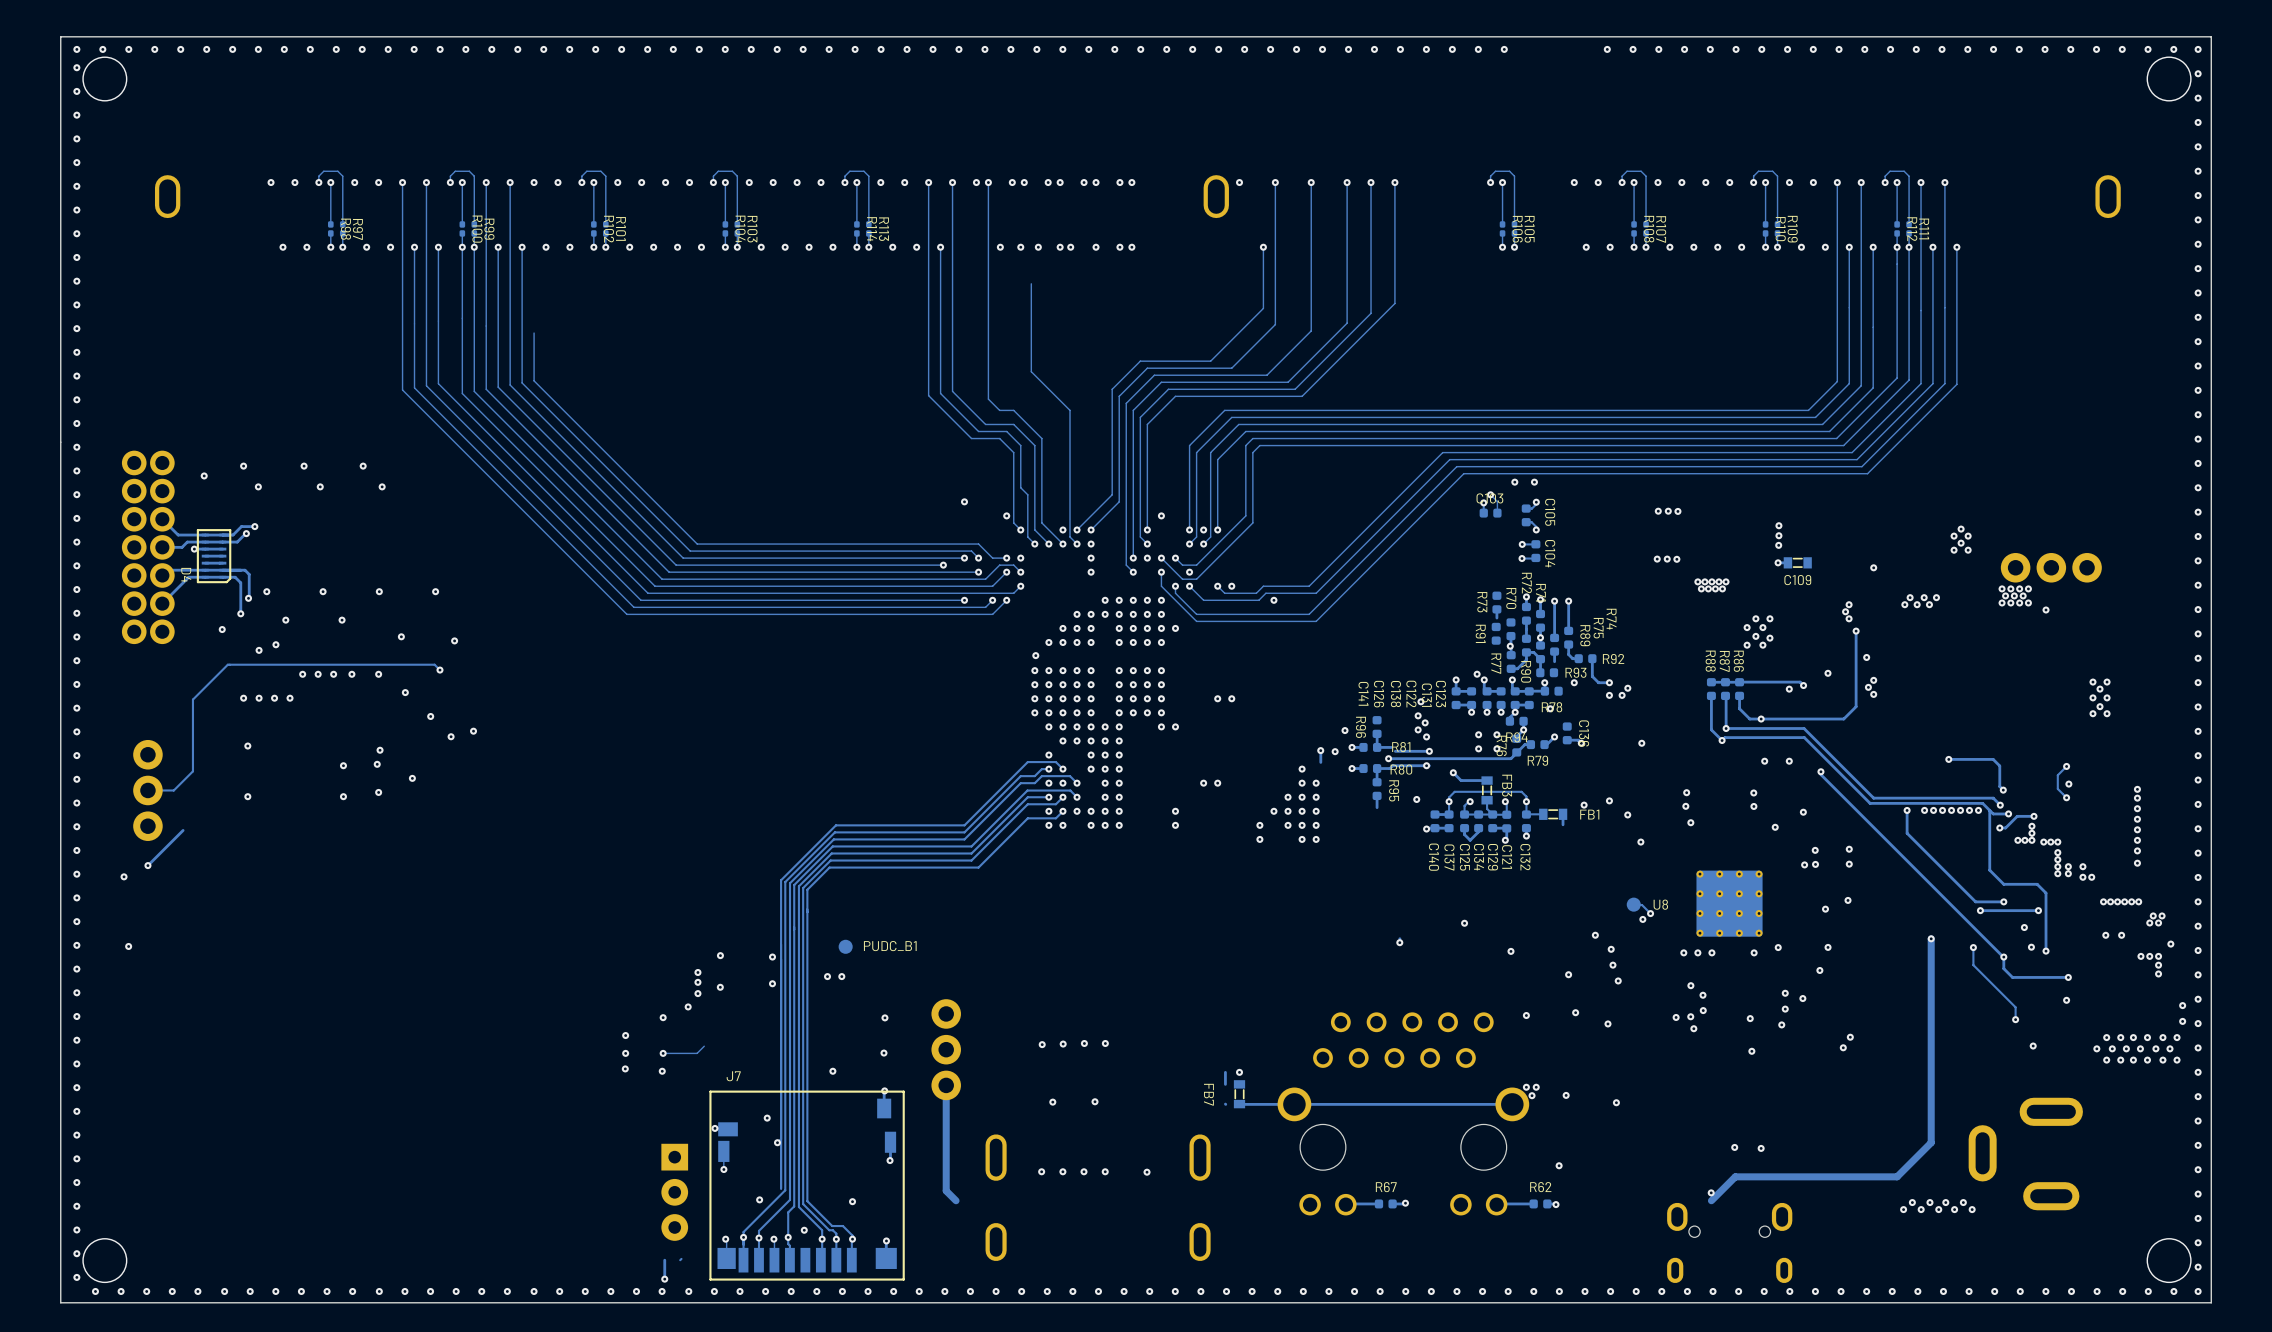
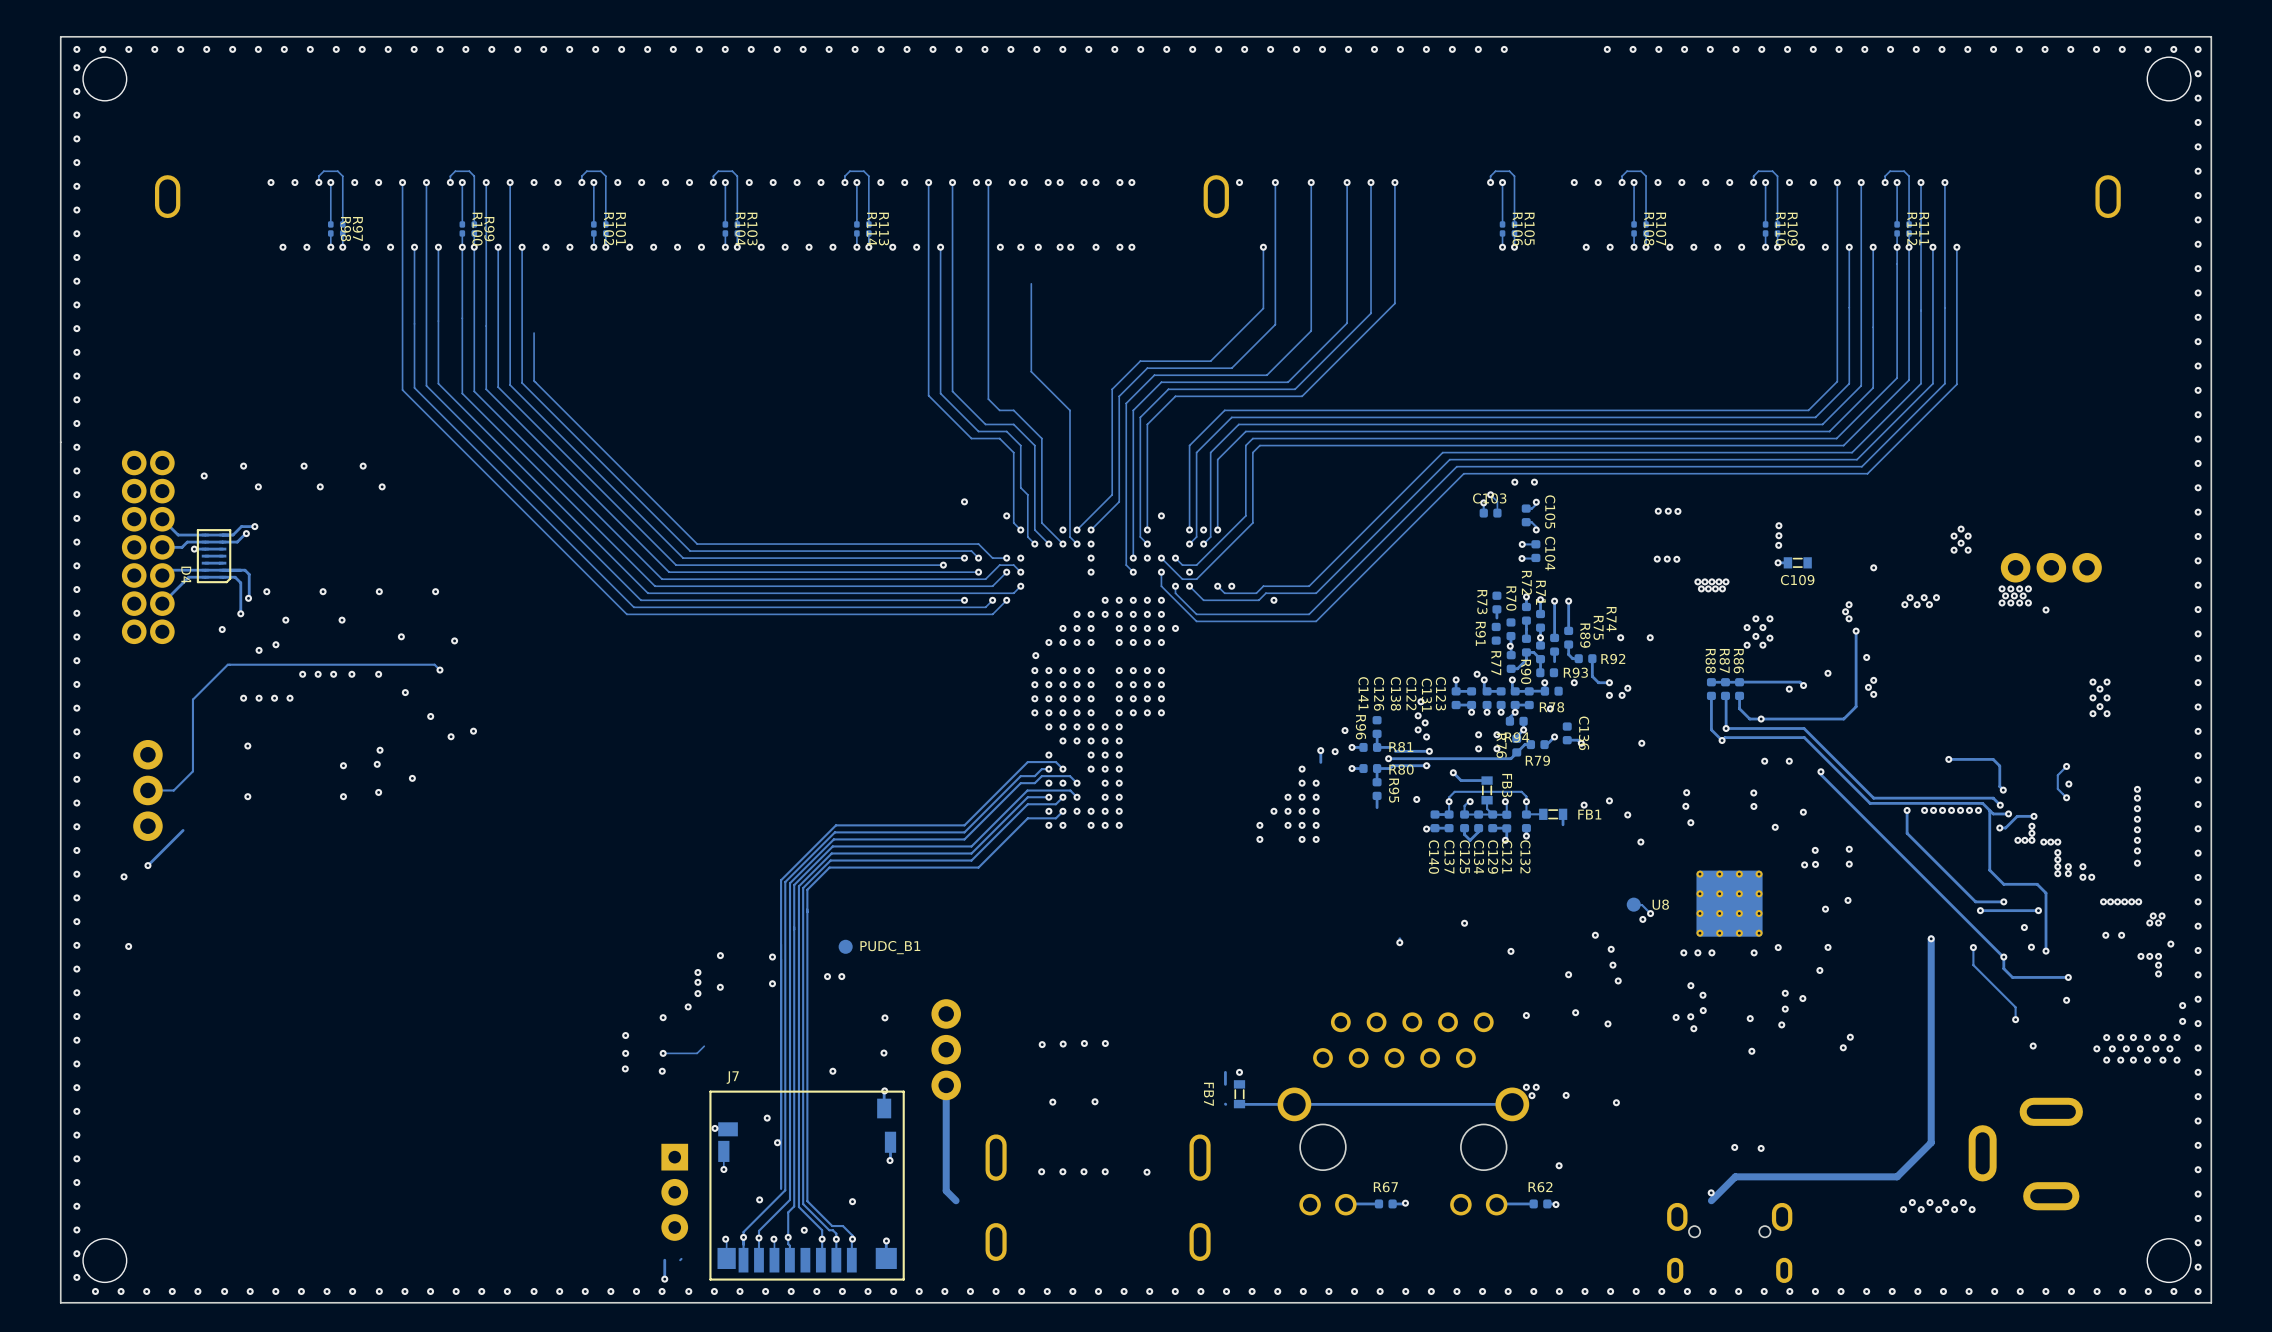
via: none -> (1620, 637)
via: none -> (1650, 637)
via: (1217, 698) -> none
via: (1231, 698) -> none
via: (1161, 726) -> none
via: (1175, 726) -> none
via: (1203, 783) -> none
via: (1217, 783) -> none
via: (1175, 811) -> none
via: (1175, 825) -> none

